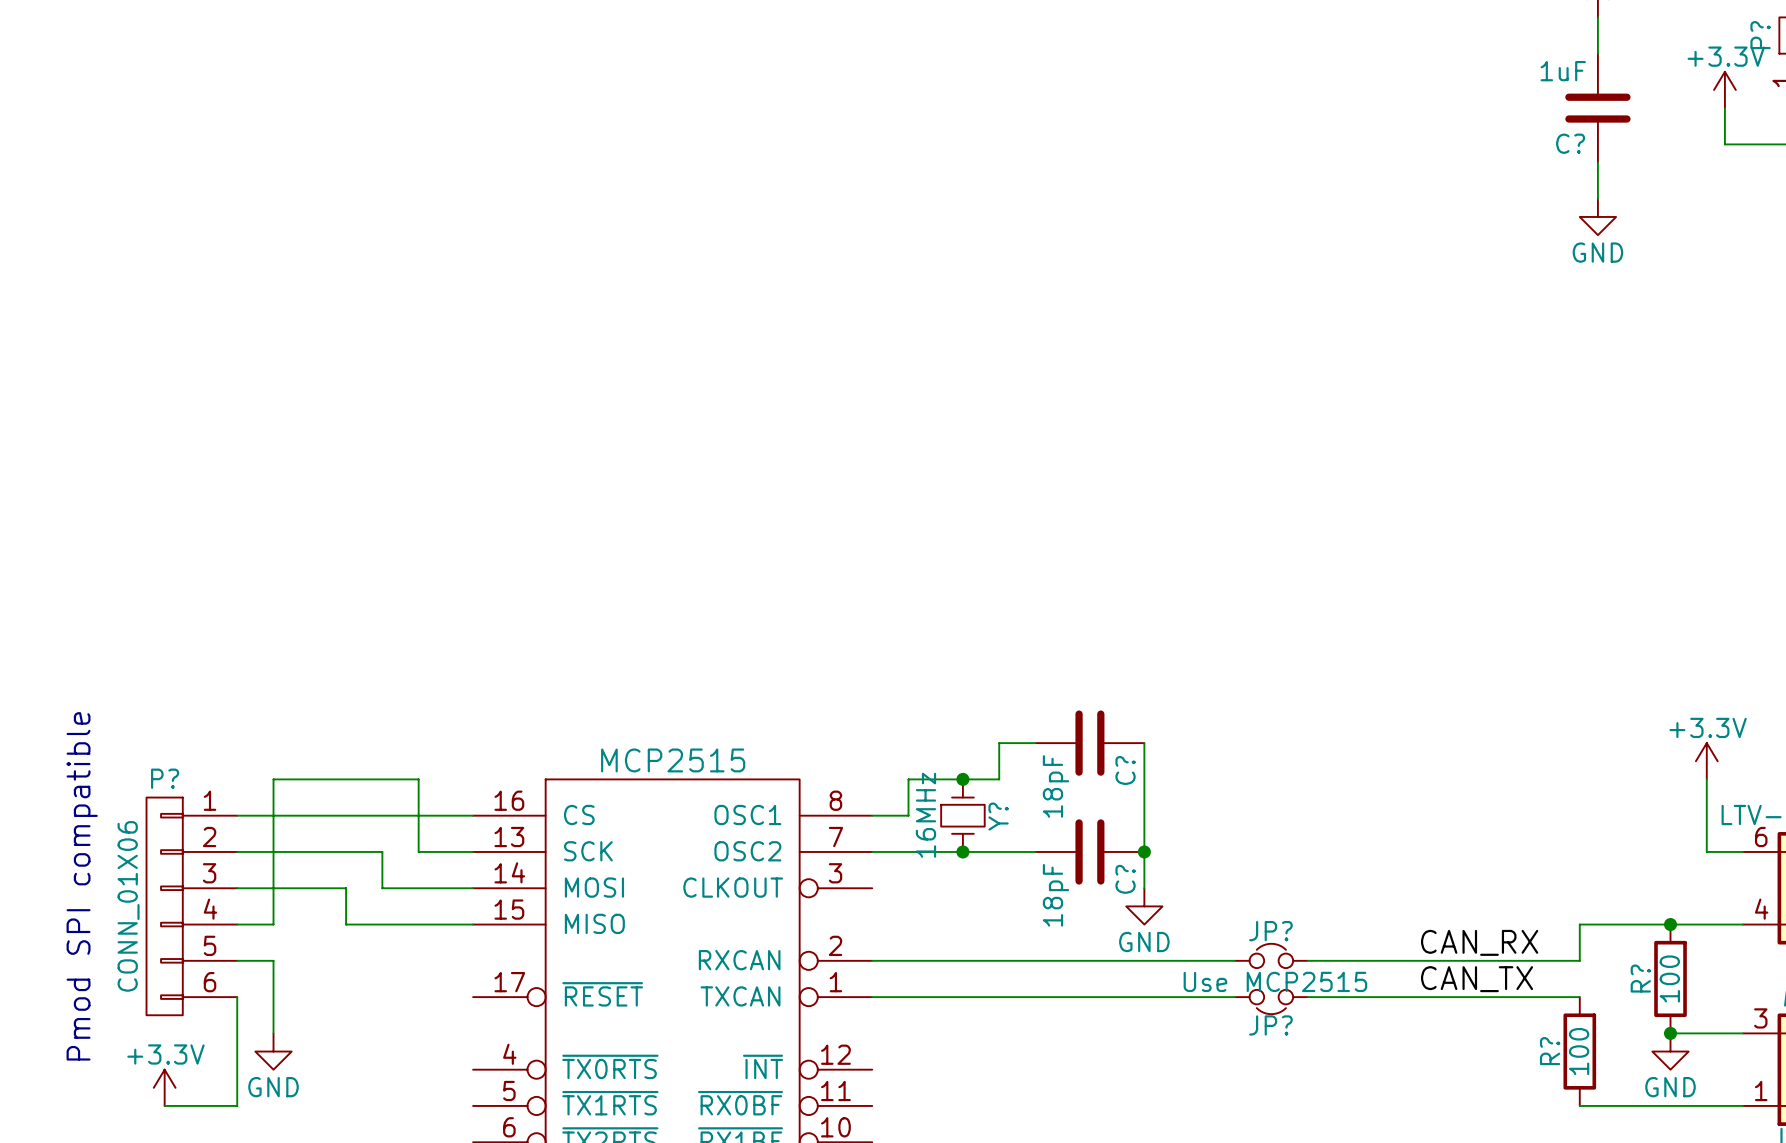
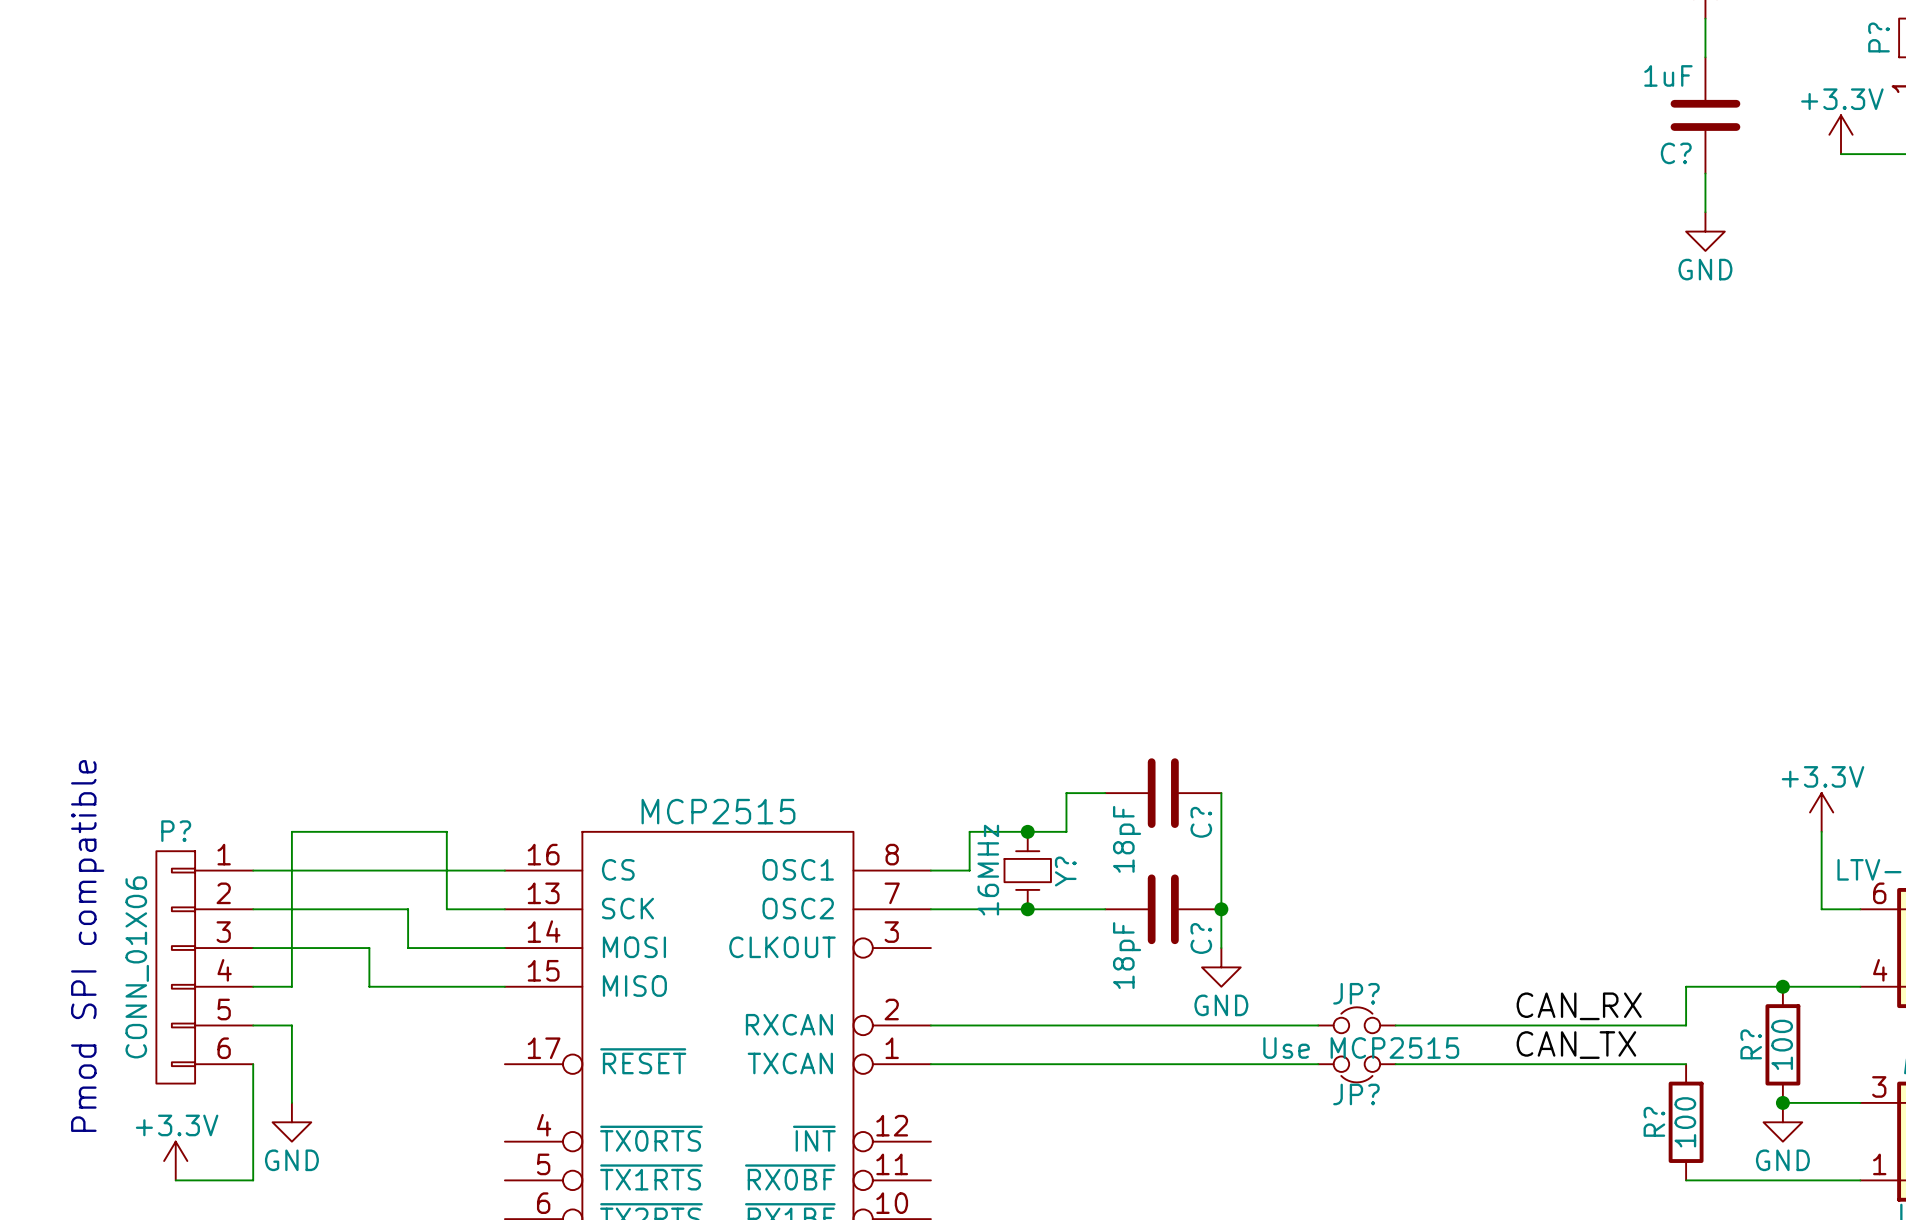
power symbol position: +3.3V (1724, 89) -> +3.3V (1841, 134)

